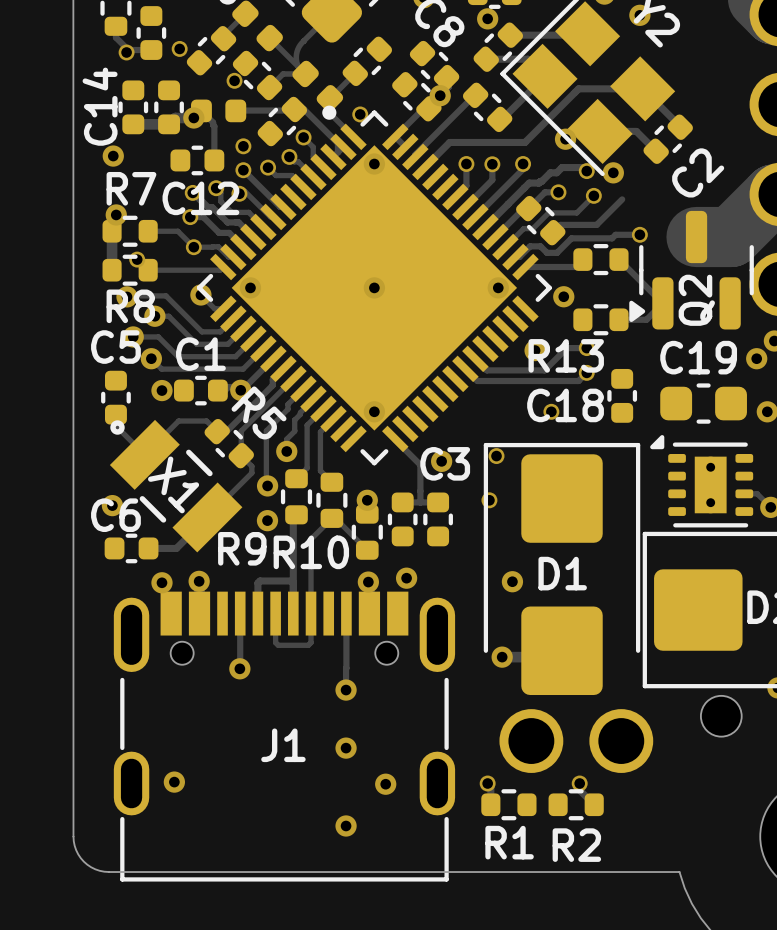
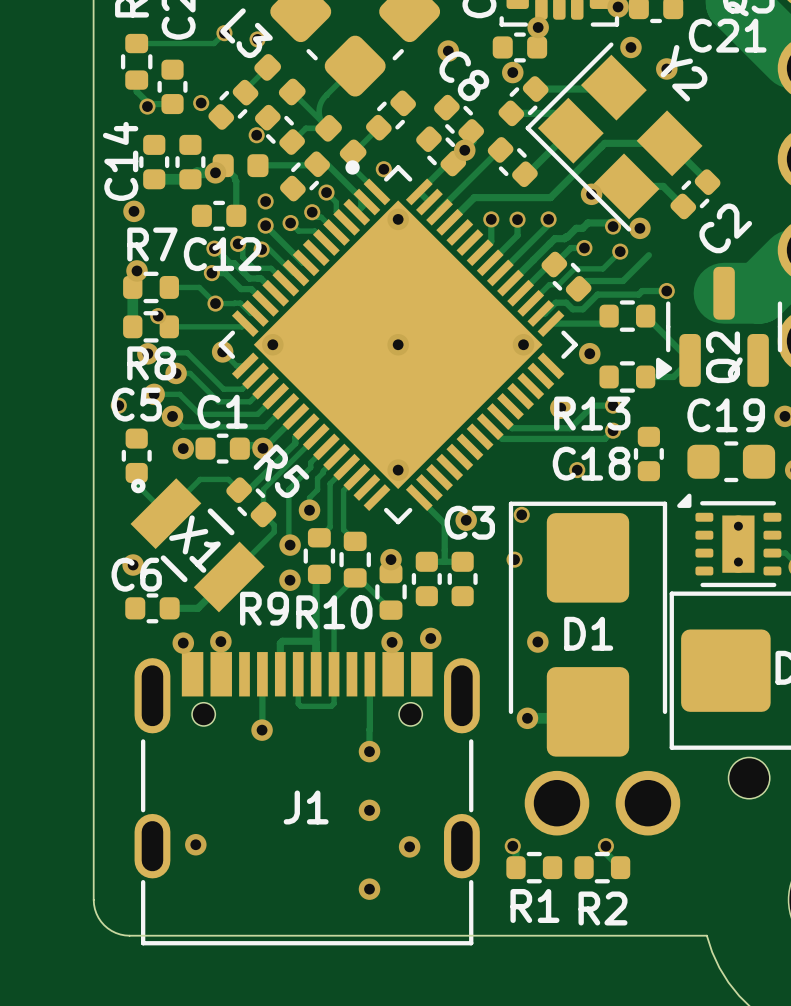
via: none -> (118, 405)

